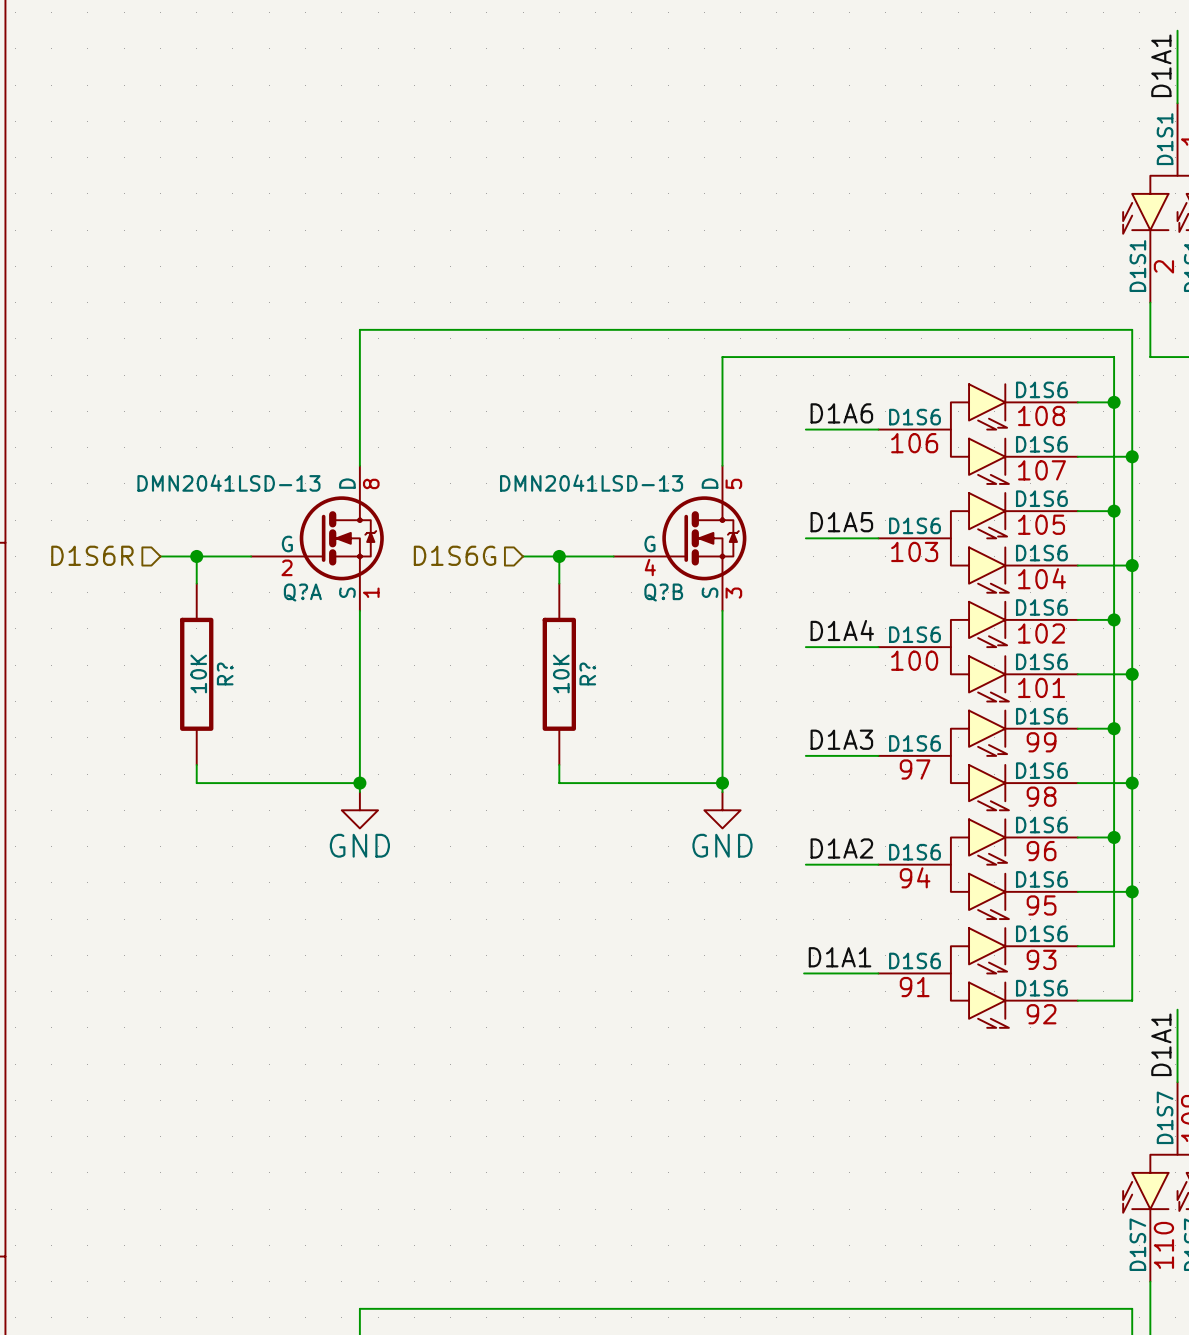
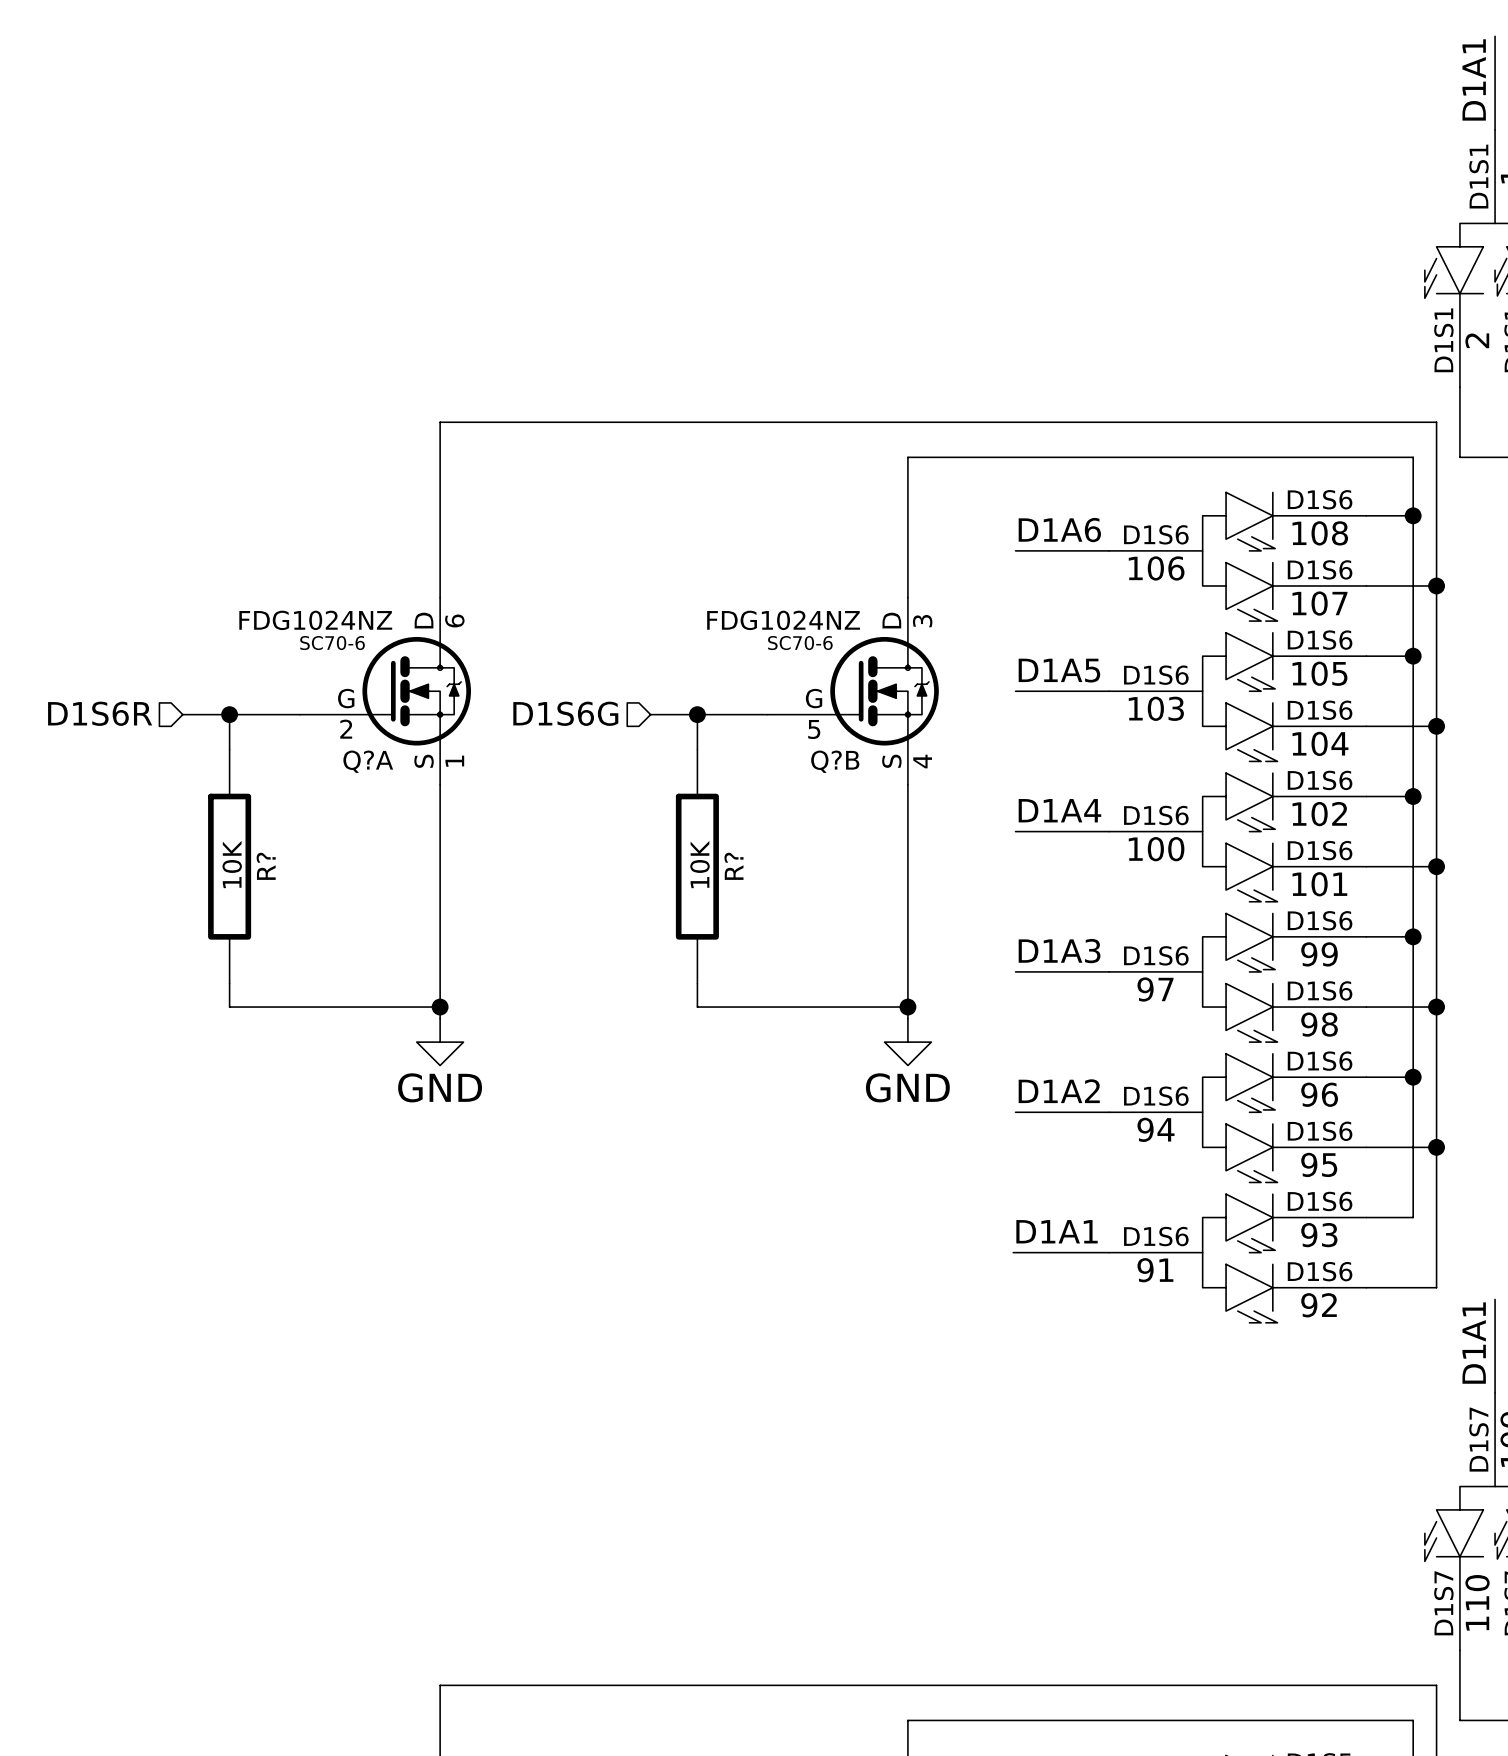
Q?A value: DMN2041LSD-13 (228, 483) -> FDG1024NZ (315, 620)
Q?A pin number: 8 (371, 483) -> 6 (454, 620)
Q?B value: DMN2041LSD-13 (591, 483) -> FDG1024NZ (783, 620)
Q?B pin number: 5 (733, 483) -> 3 (922, 621)
Q?A text: none -> SC70-6 (332, 643)
Q?B text: none -> SC70-6 (800, 643)
Q?B pin number: 4 (650, 567) -> 5 (814, 729)
Q?B pin number: 3 (733, 593) -> 4 (922, 761)

